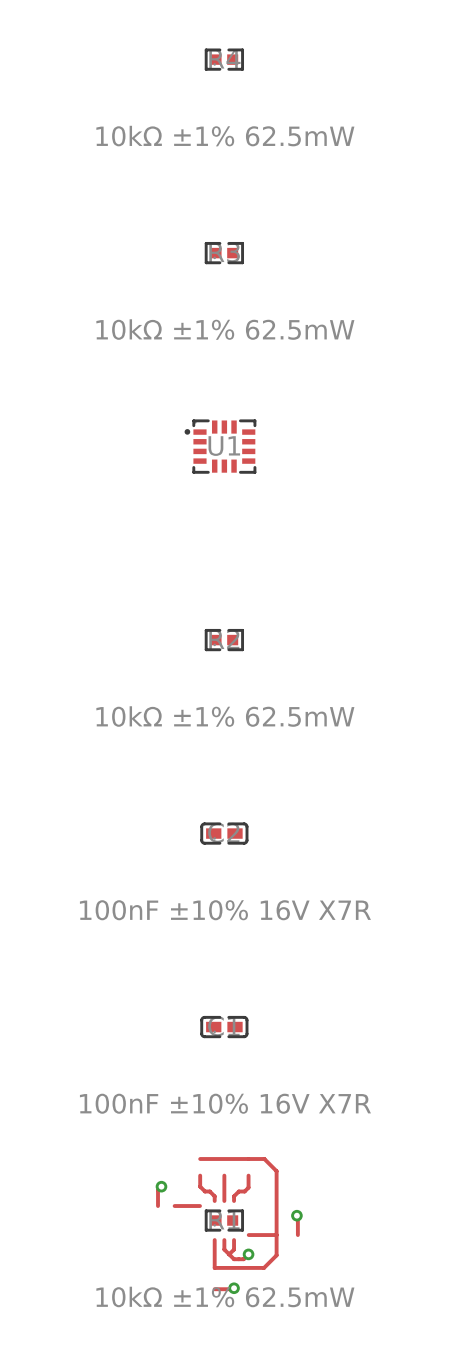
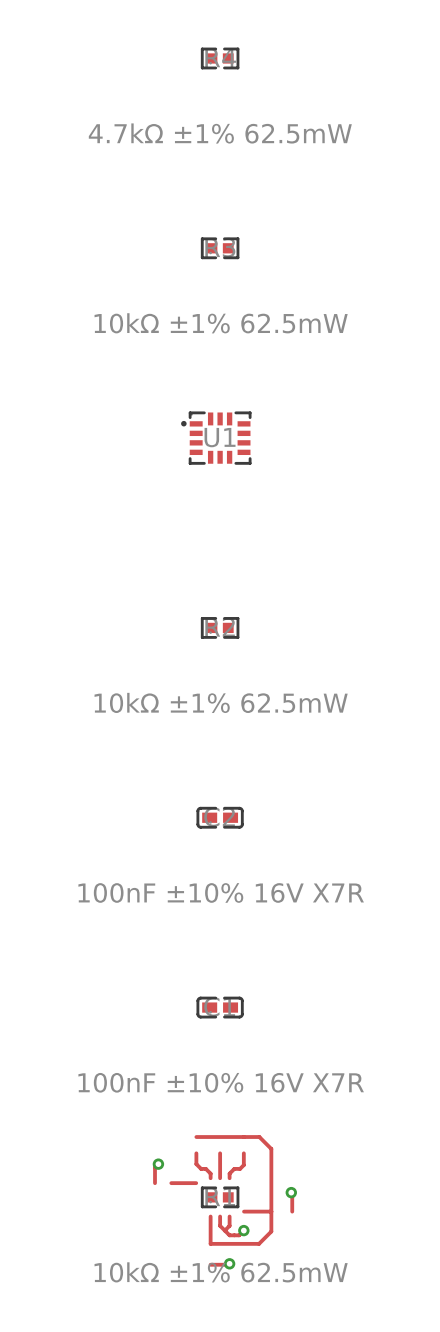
part value: 10kΩ ±1% 62.5mW (225, 136) -> 4.7kΩ ±1% 62.5mW (220, 133)

